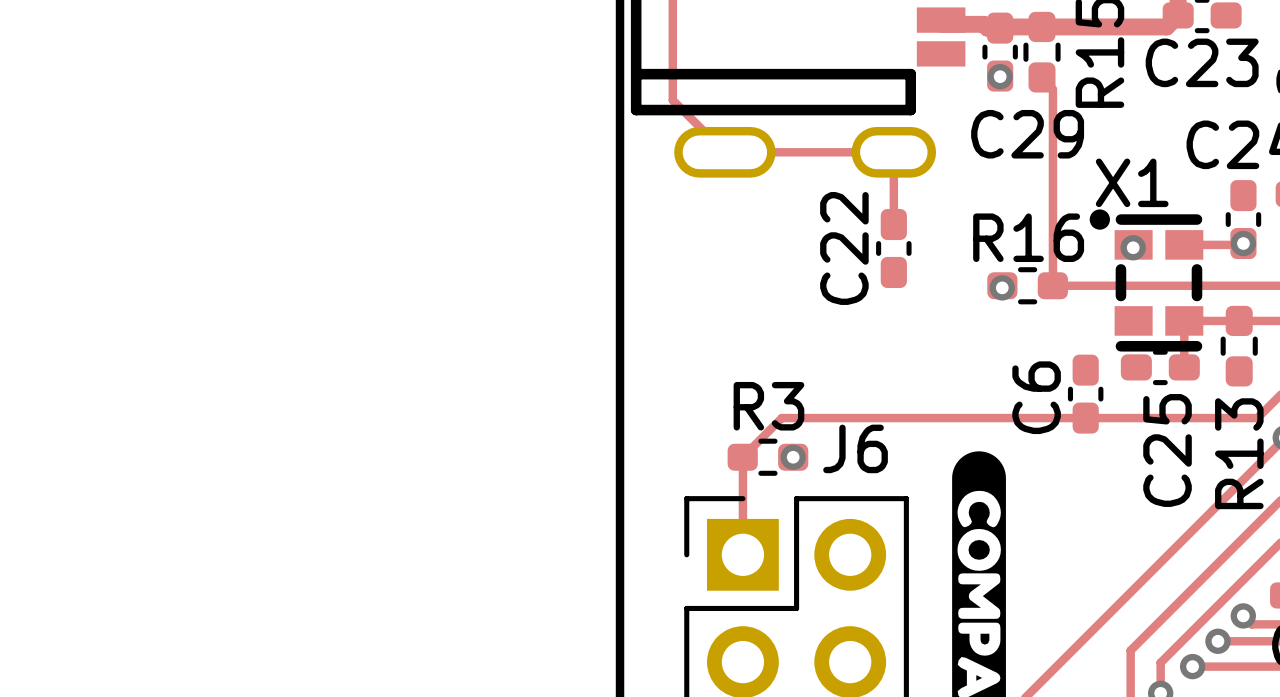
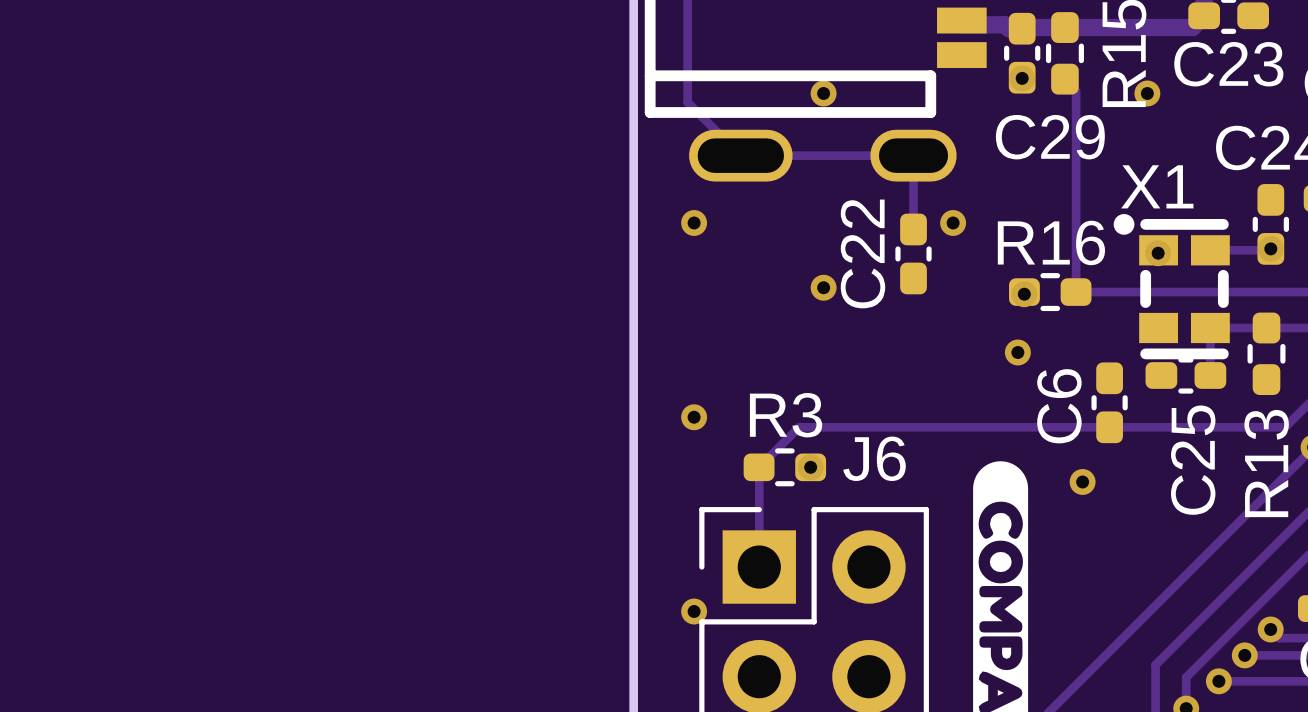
via: none -> (823, 93)
via: none -> (1147, 93)
via: none -> (694, 222)
via: none -> (953, 222)
via: none -> (823, 287)
via: none -> (1017, 352)
via: none -> (694, 417)
via: none -> (1082, 482)
via: none -> (694, 611)

